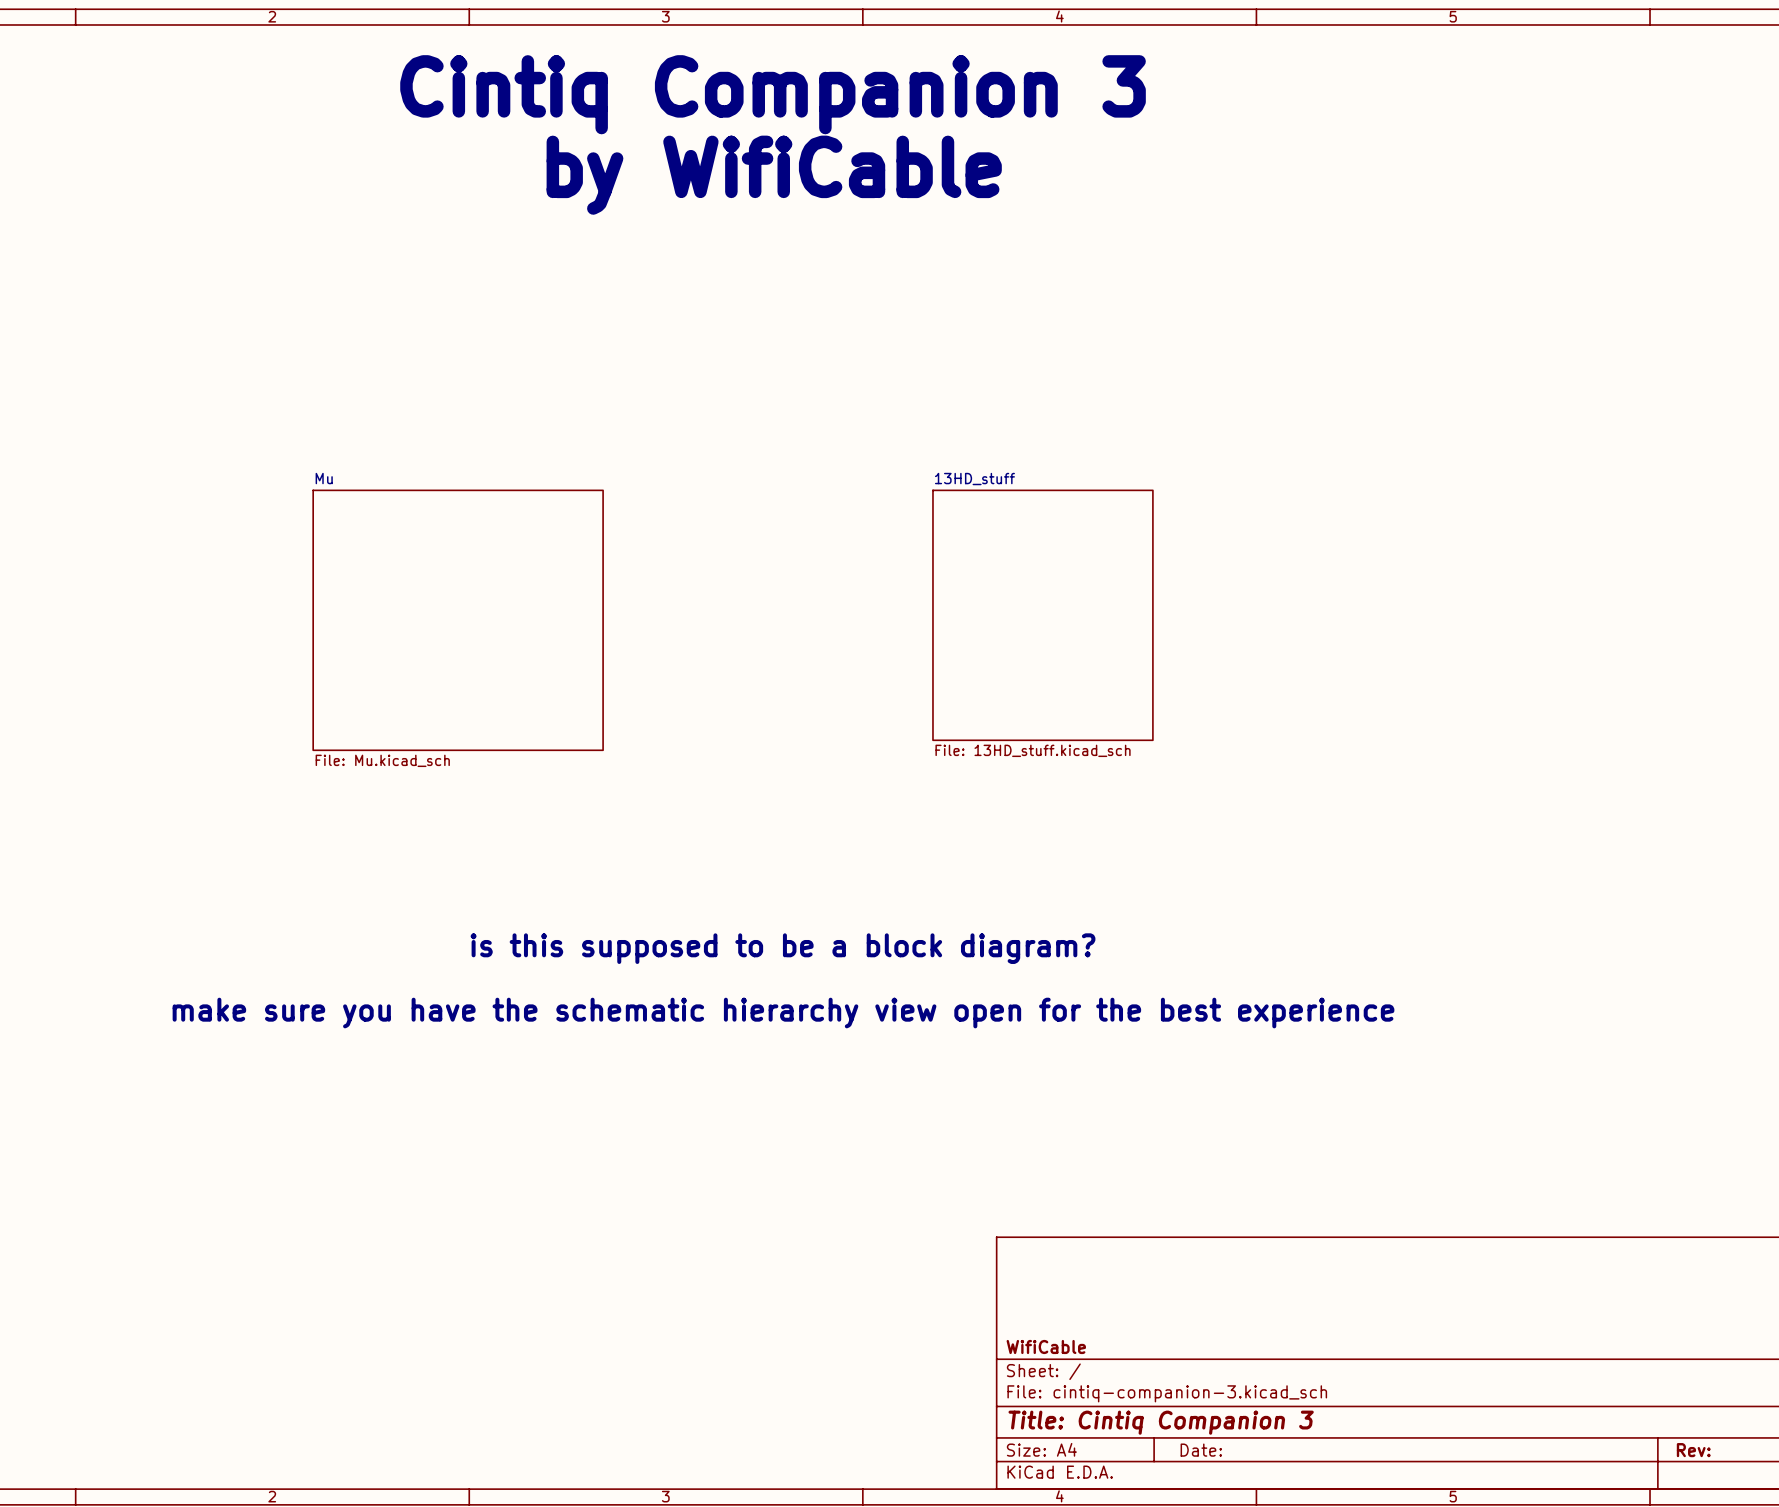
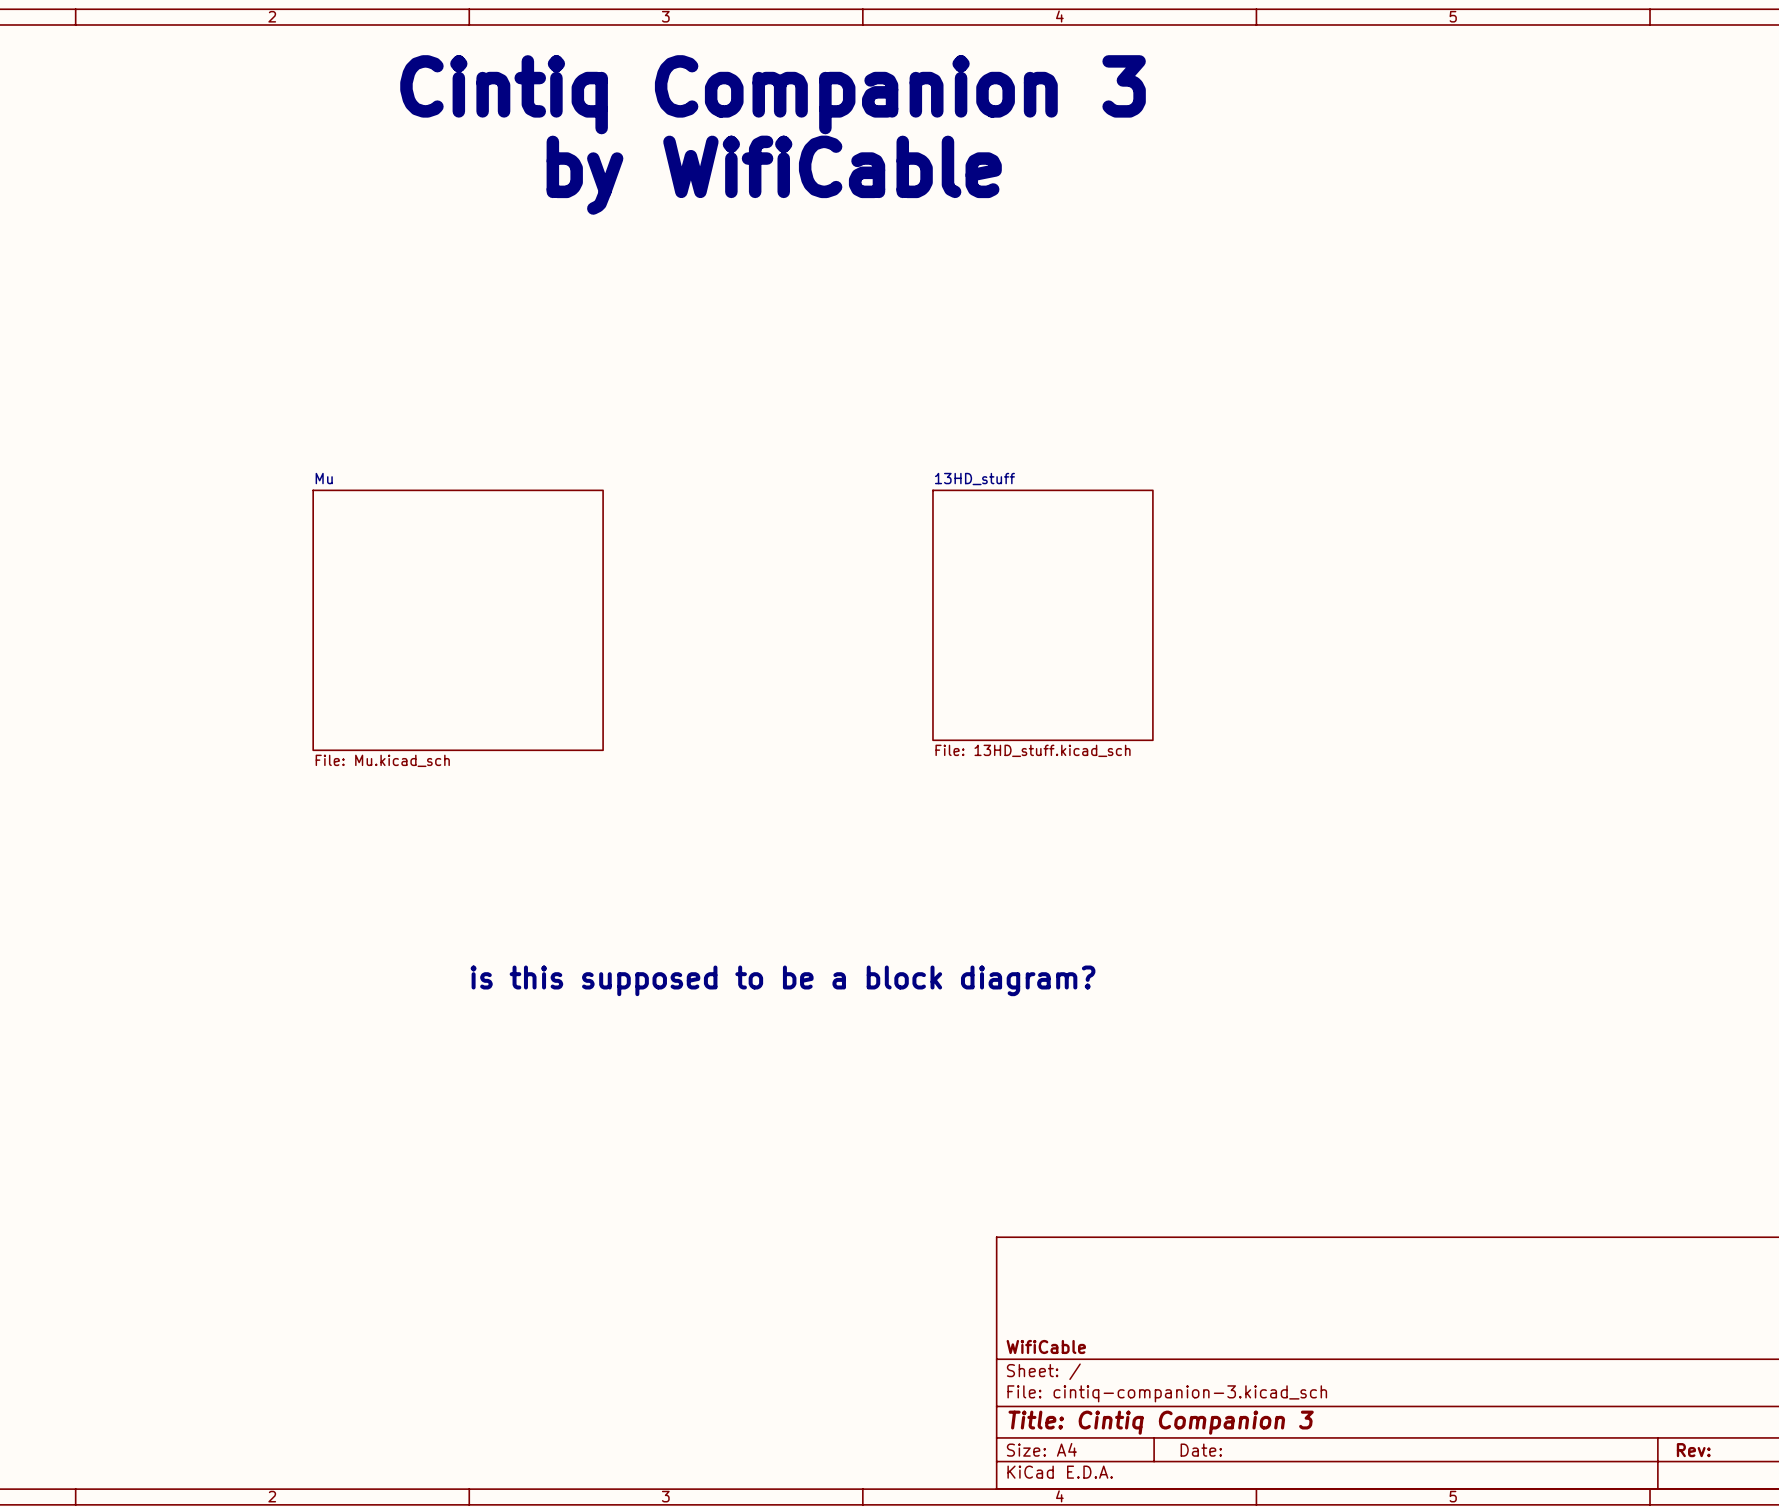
text position: is this supposed to be a block diagram? (783, 948) -> is this supposed to be a block diagram? (783, 980)
text: make sure you have the schematic hierarchy view open for the best experience (783, 1013) -> none

